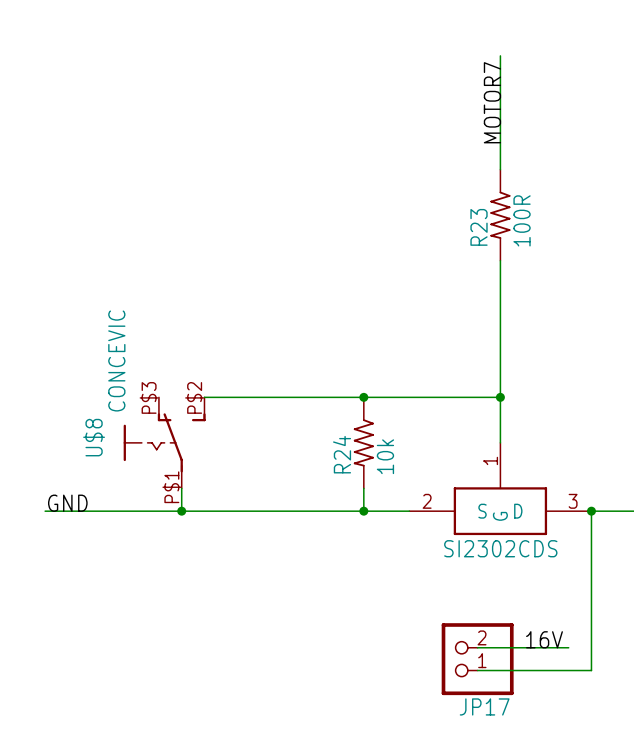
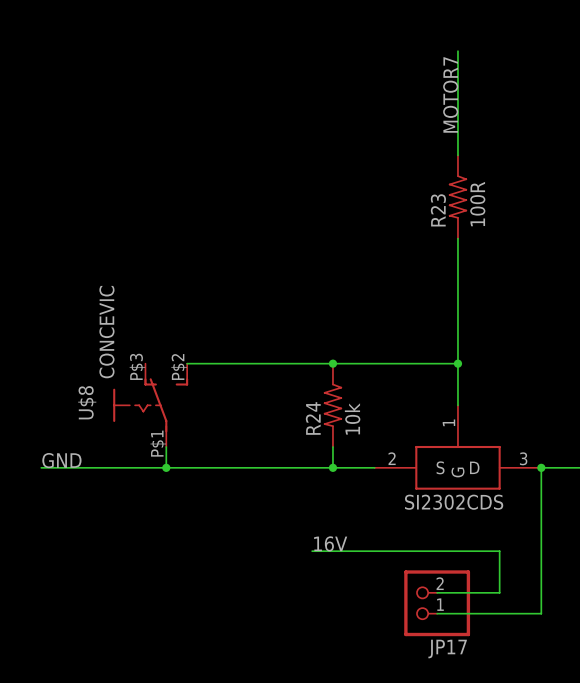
label position: 16V (544, 639) -> 16V (330, 543)
wire: (545, 647) (568, 647) -> (499, 592) (499, 551) (312, 551)

